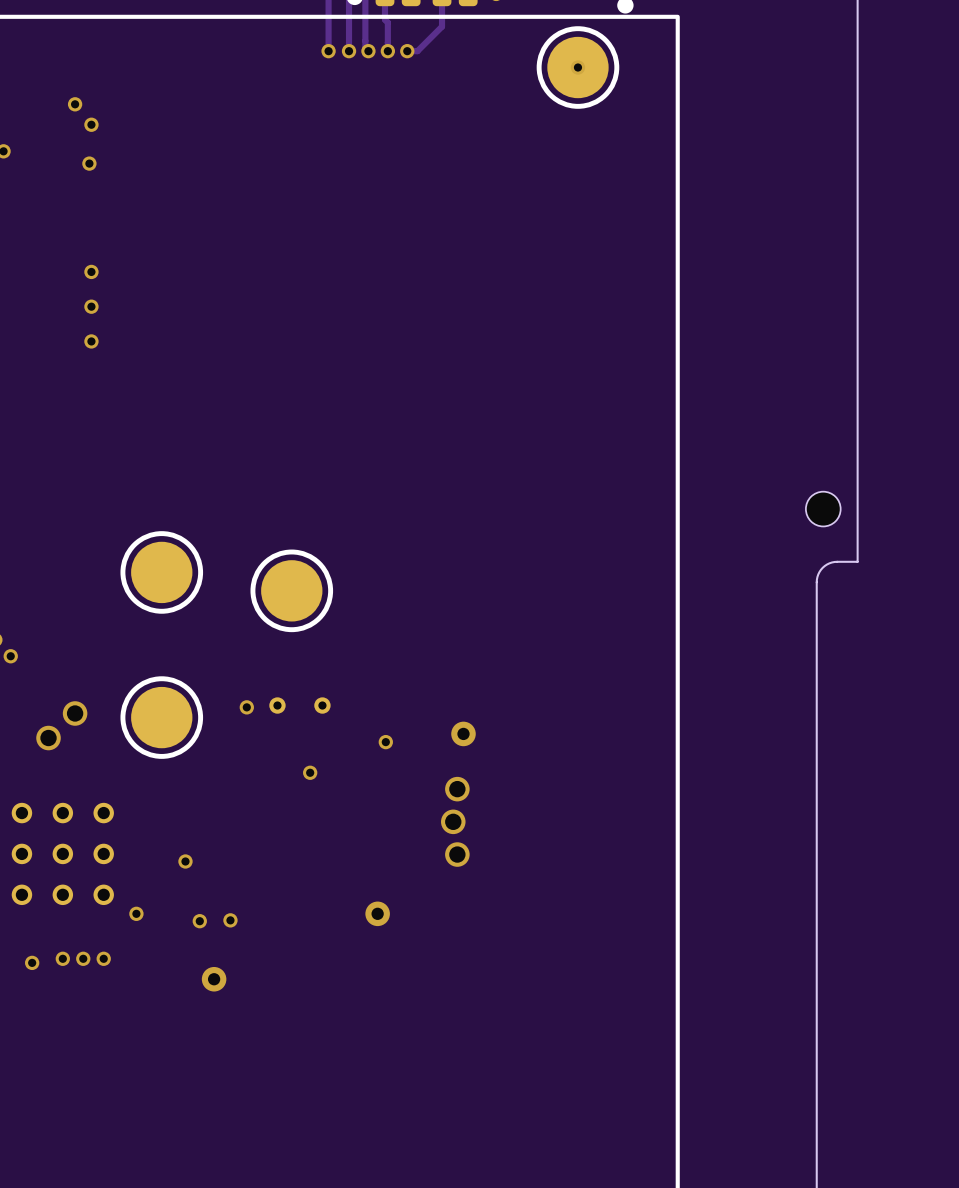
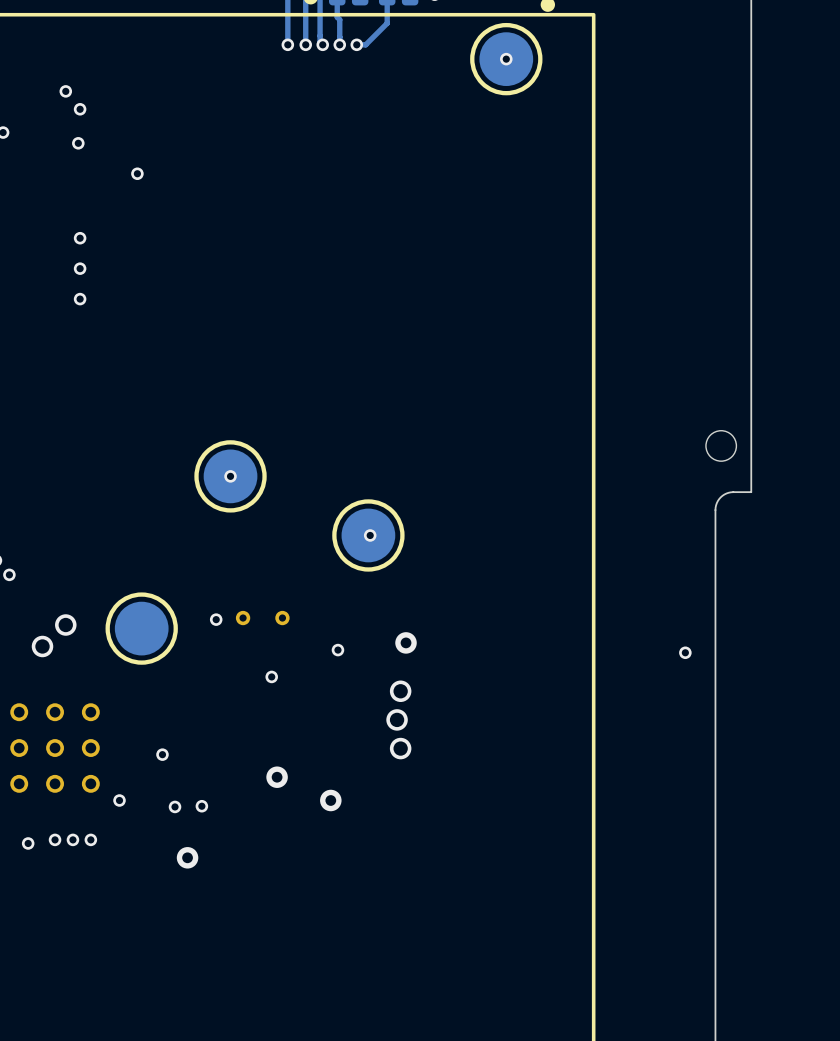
via: none -> (137, 173)
part: none -> (230, 476)
via: none -> (230, 476)
part: (161, 572) -> none
part: (291, 590) -> none
part: none -> (368, 535)
via: none -> (370, 535)
via: none -> (685, 652)
via: none -> (277, 777)

